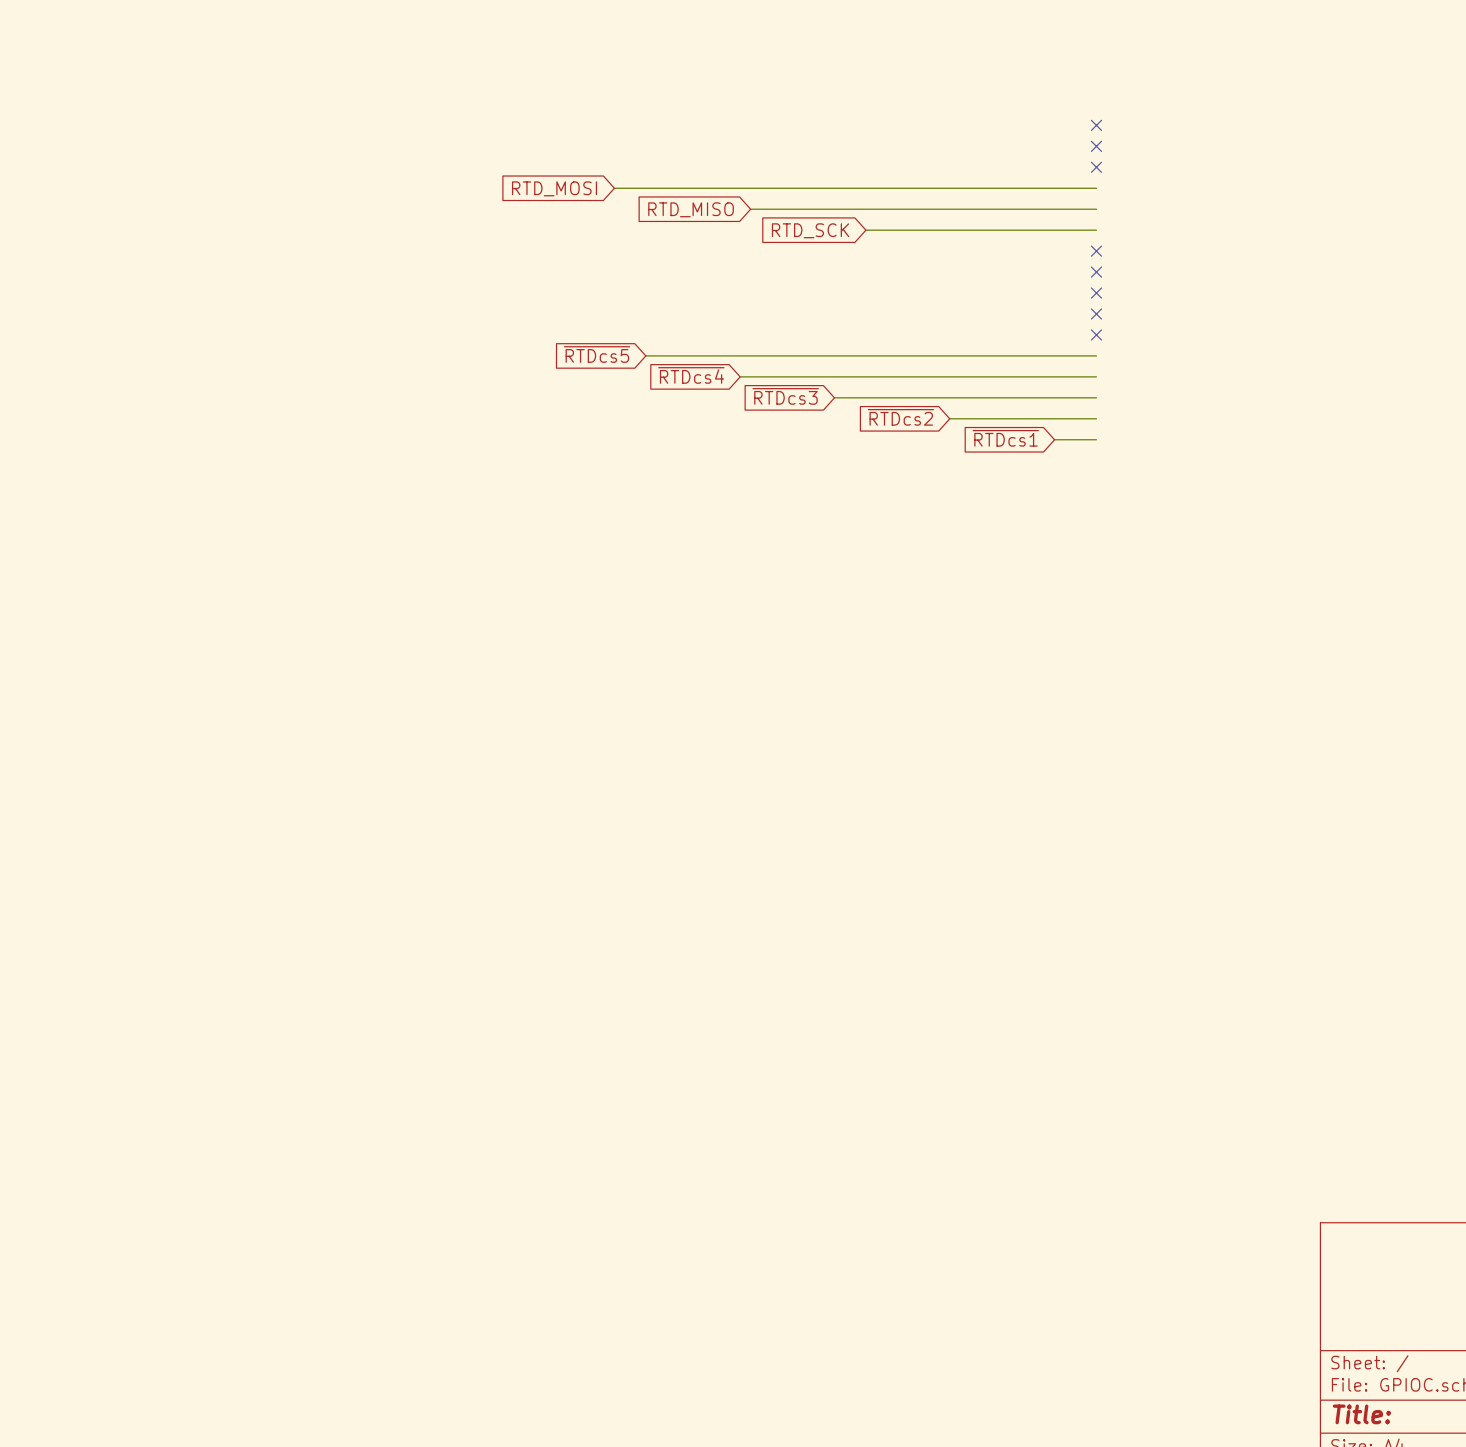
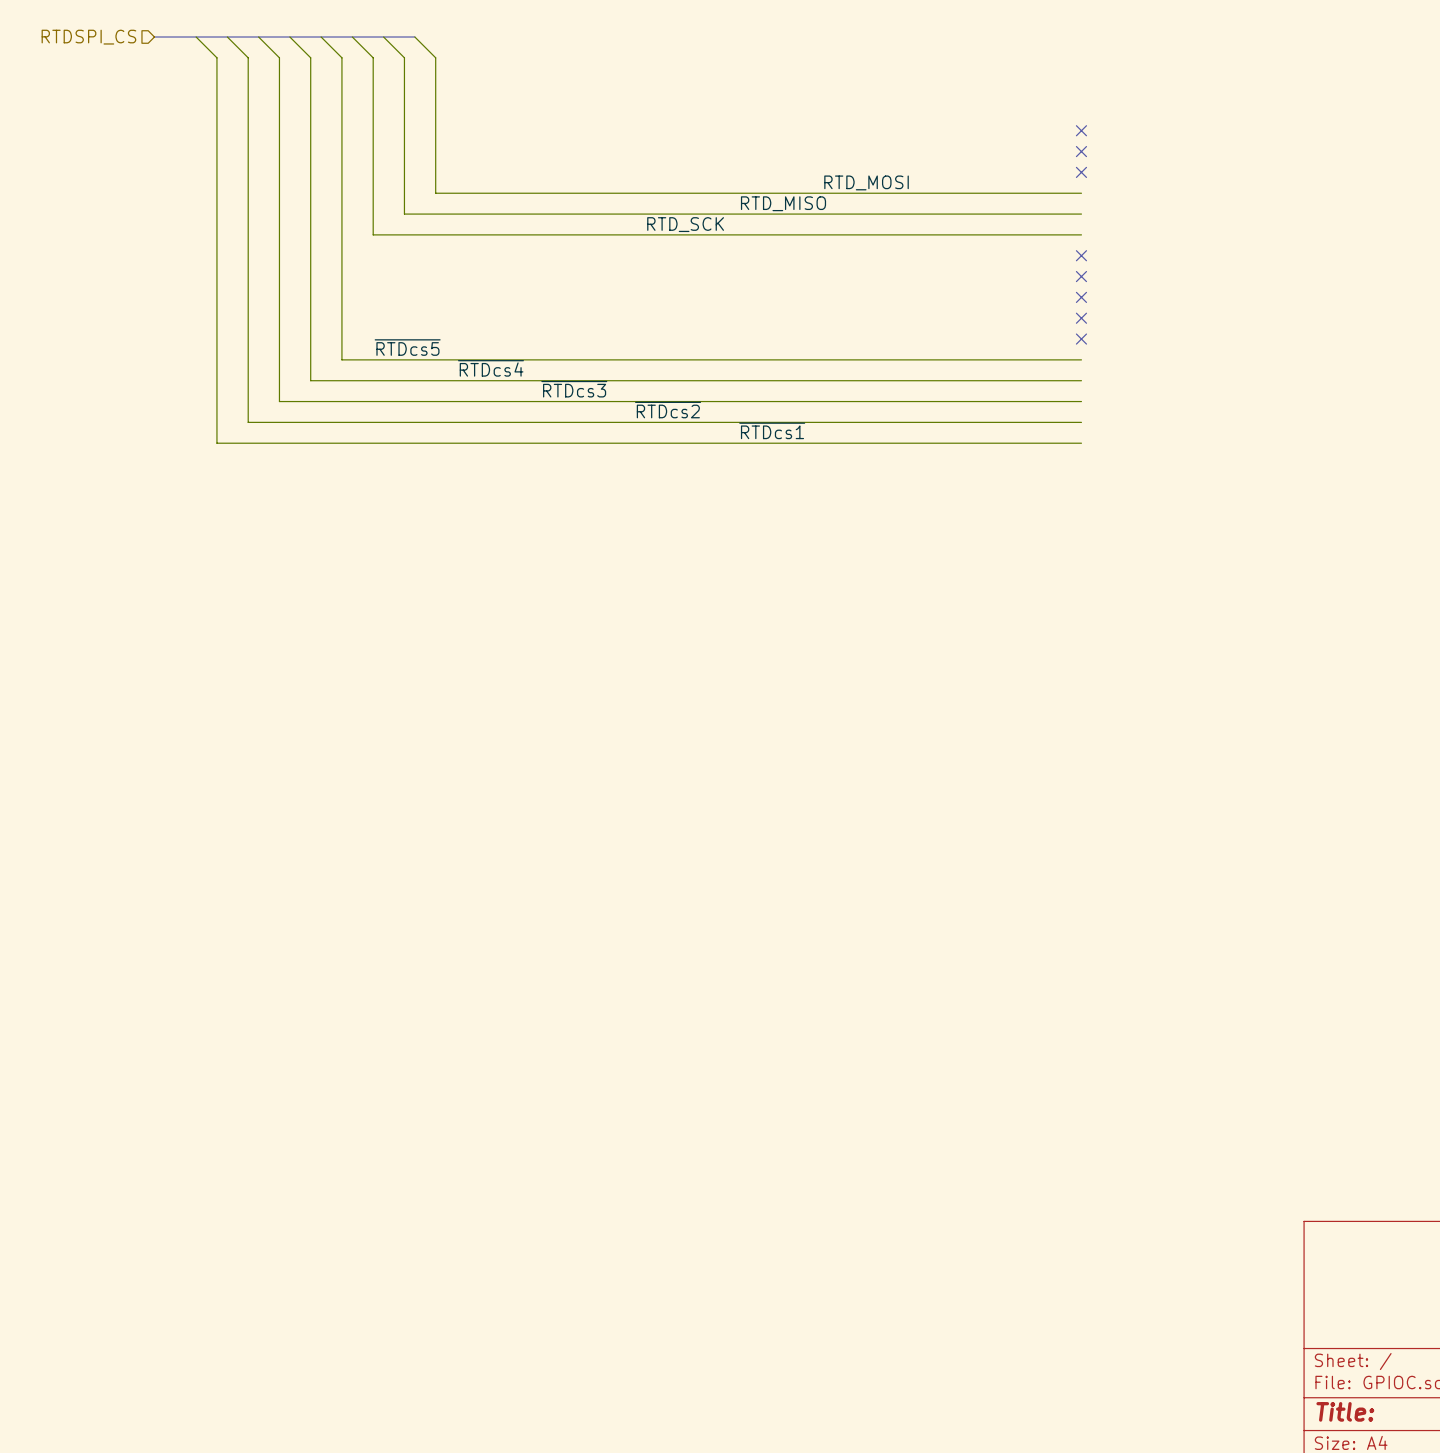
hierarchical label: none -> RTDSPI_CS (88, 37)
bus: none -> (154, 37) (414, 37)
wire: none -> (196, 37) (216, 57) (216, 443) (1039, 443)
wire: none -> (227, 37) (248, 57) (248, 422) (935, 422)
wire: none -> (258, 37) (279, 57) (279, 401) (821, 401)
wire: none -> (289, 37) (310, 57) (310, 380) (727, 380)
wire: none -> (321, 37) (341, 57) (341, 359) (633, 359)
wire: none -> (352, 37) (373, 57) (373, 234) (852, 234)
wire: none -> (383, 37) (404, 57) (404, 214) (737, 214)
wire: none -> (414, 37) (435, 57) (435, 193) (602, 193)
label: none -> RTD_MOSI (866, 182)
global label: RTD_MOSI (554, 188) -> none
label: none -> RTD_MISO (783, 203)
global label: RTD_MISO (691, 209) -> none
label: none -> RTD_SCK (685, 224)
global label: RTD_SCK (810, 230) -> none
label: none -> ~{RTDcs5} (407, 347)
global label: ~{RTDcs5} (597, 354) -> none
label: none -> ~{RTDcs4} (490, 368)
global label: ~{RTDcs4} (691, 375) -> none
label: none -> ~{RTDcs3} (574, 389)
global label: ~{RTDcs3} (785, 396) -> none
label: none -> ~{RTDcs2} (668, 410)
global label: ~{RTDcs2} (900, 417) -> none
label: none -> ~{RTDcs1} (772, 430)
global label: ~{RTDcs1} (1005, 438) -> none

